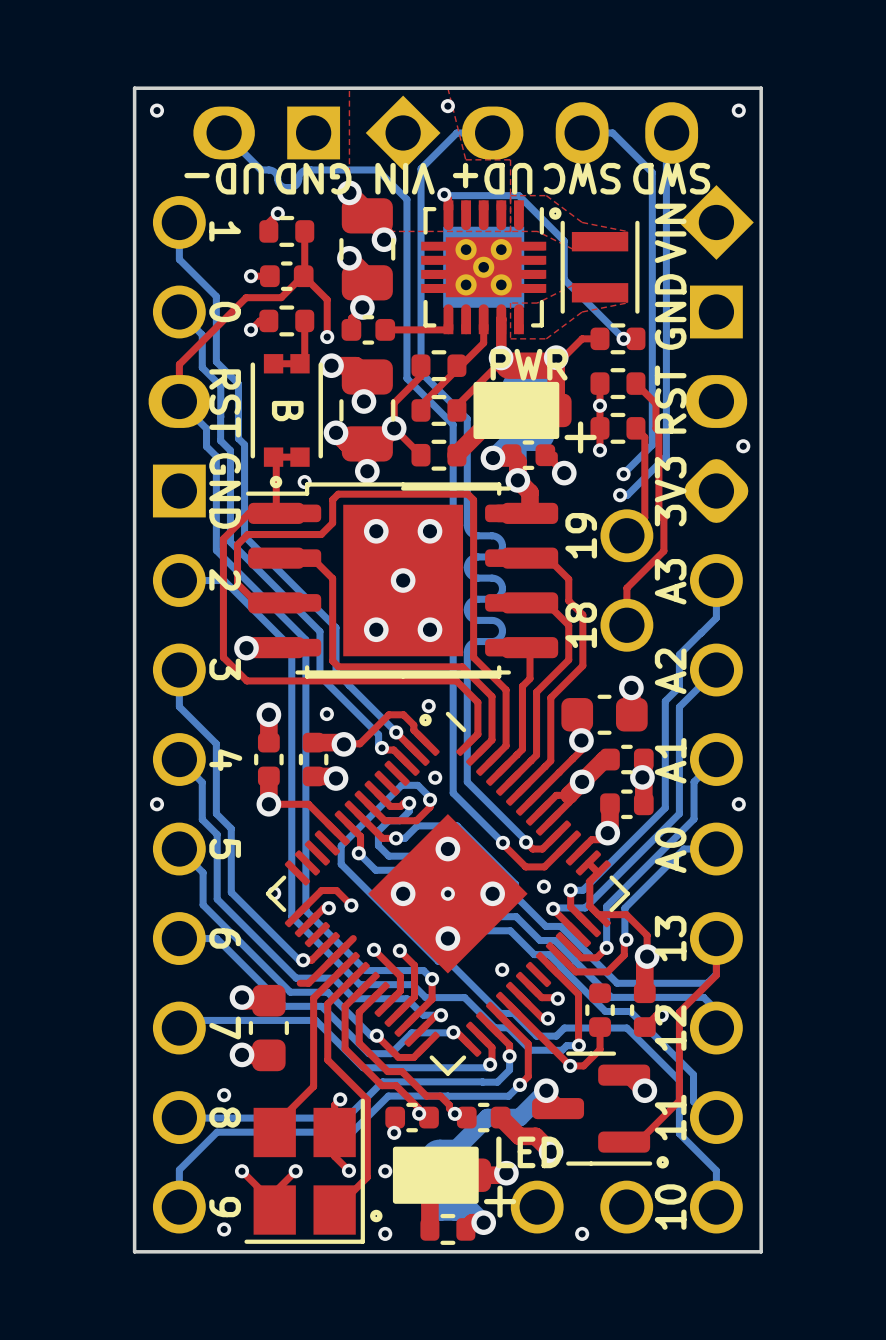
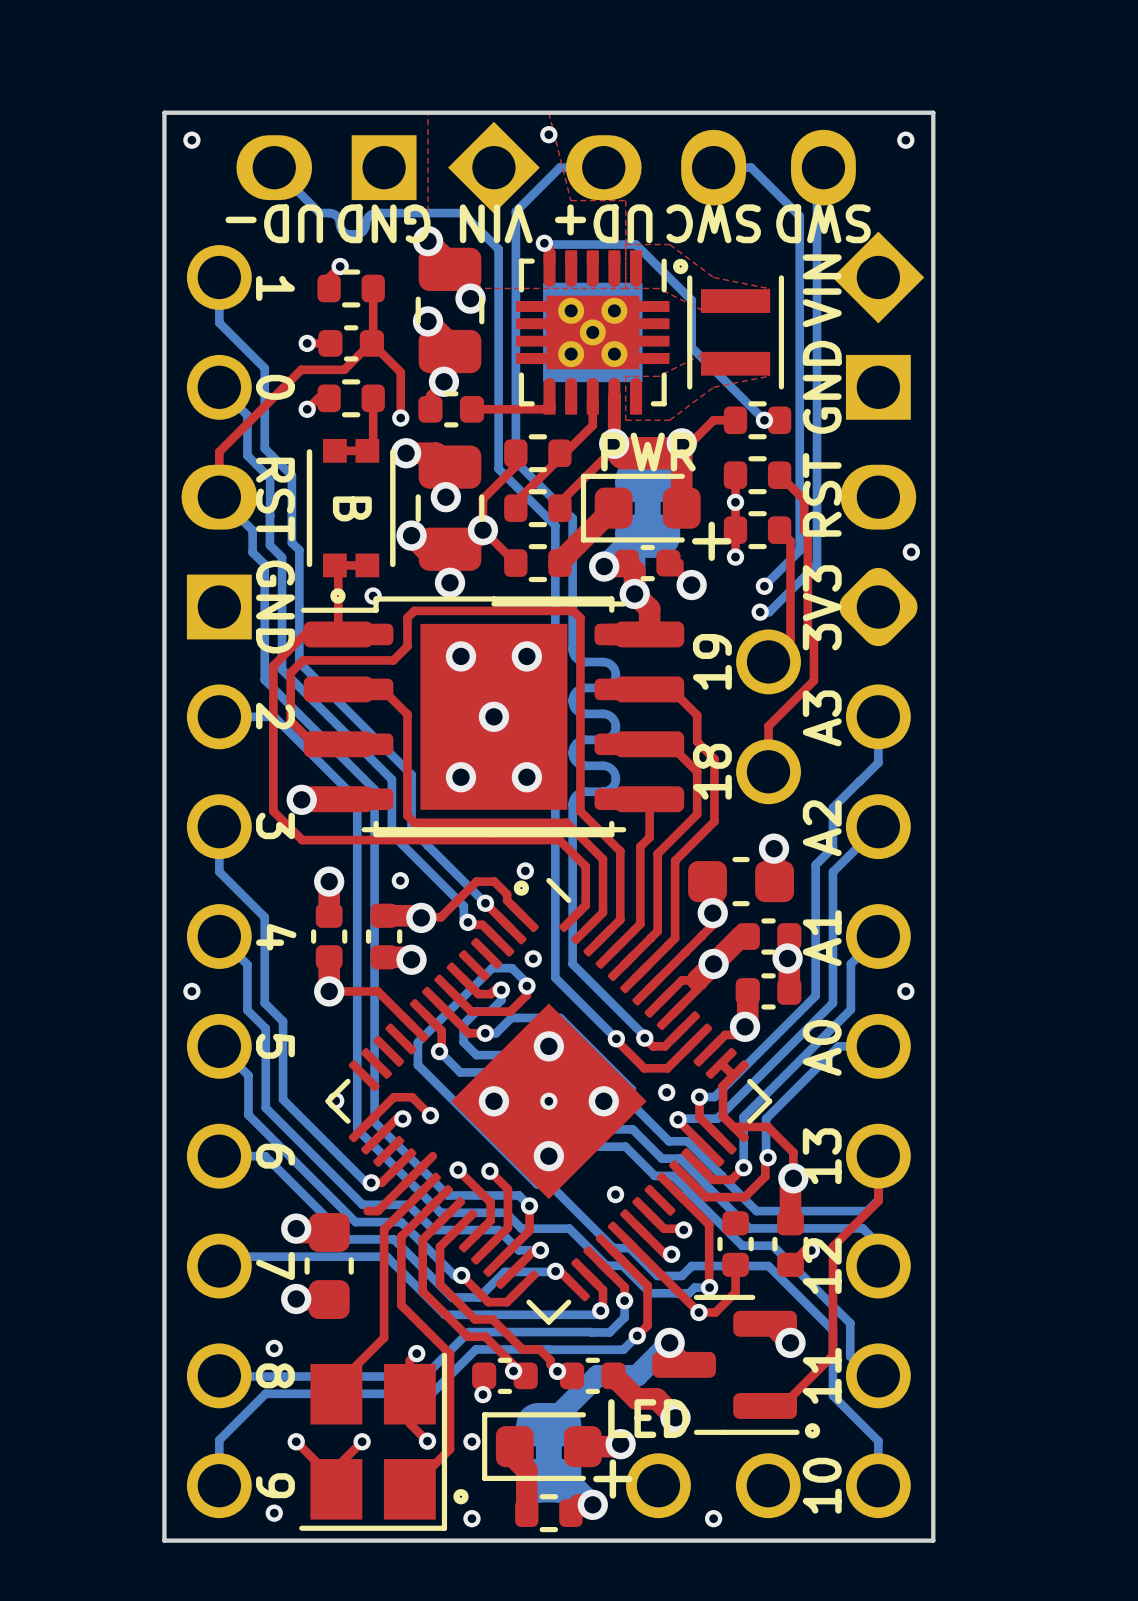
drawing: [473, 381, 560, 439] -> none
drawing: [392, 1146, 479, 1204] -> none

